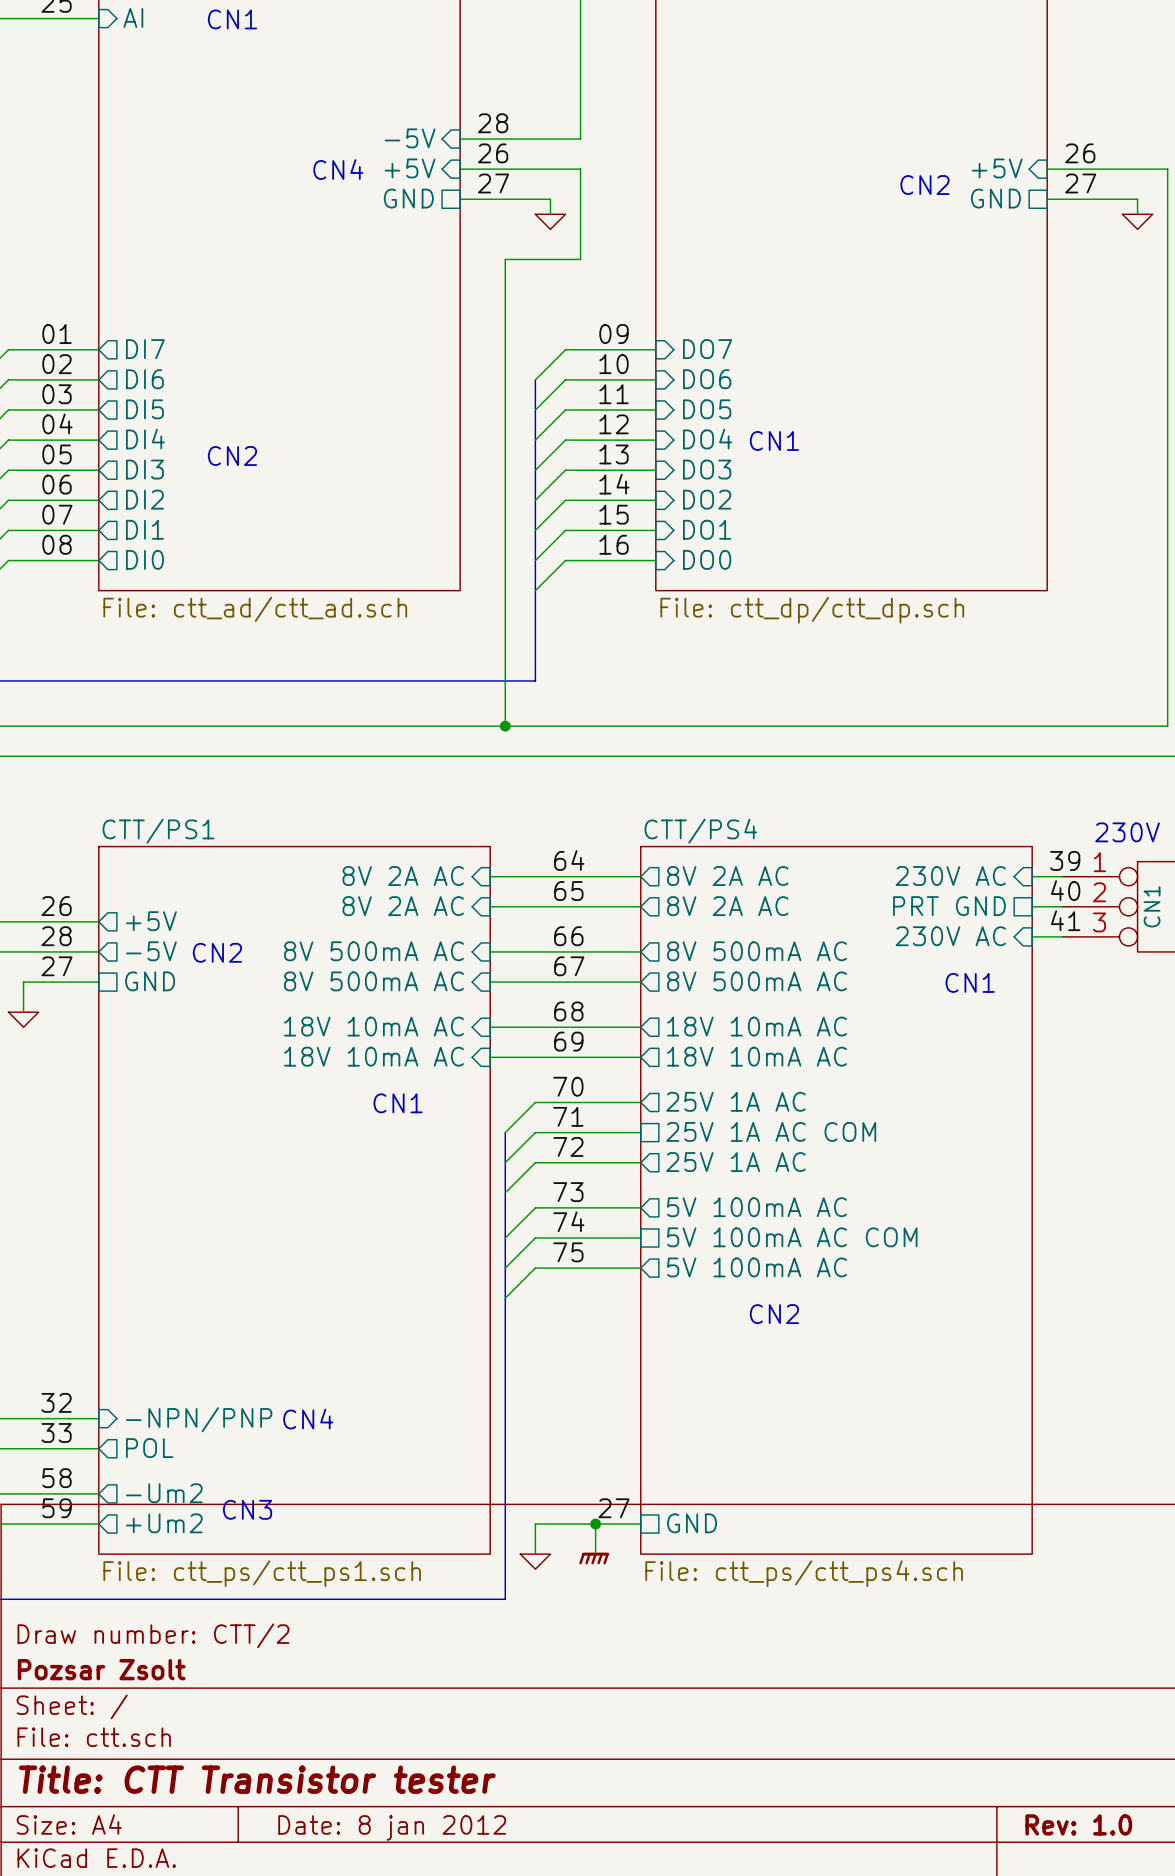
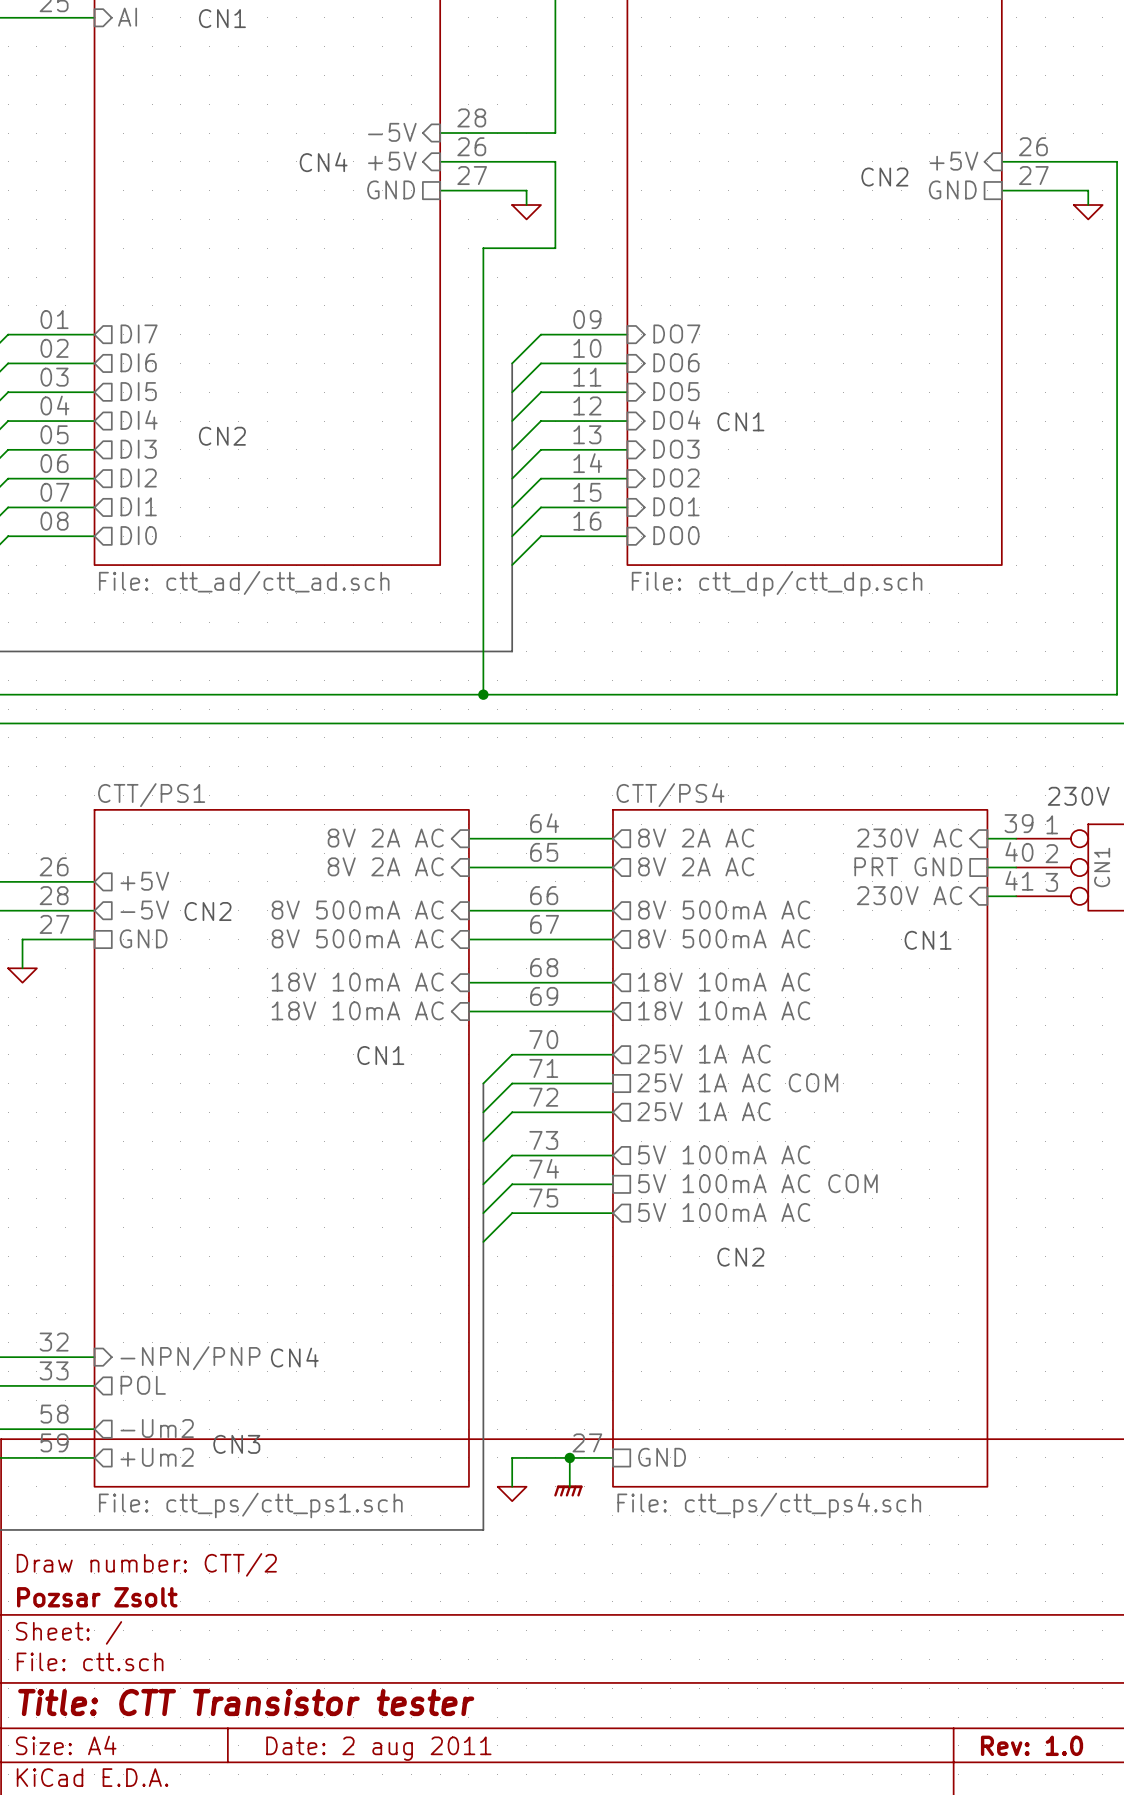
title block: Date: 8 jan 2012 (392, 1827) -> Date: 2 aug 2011 (378, 1748)

